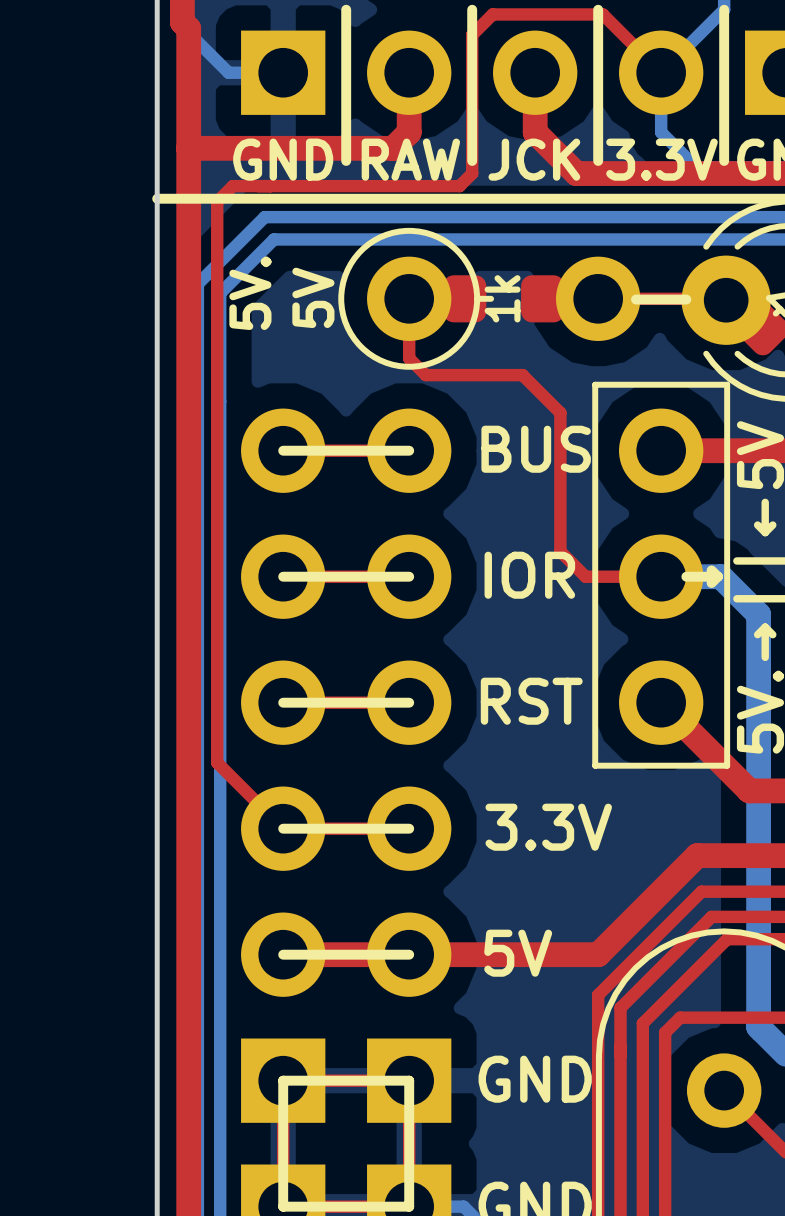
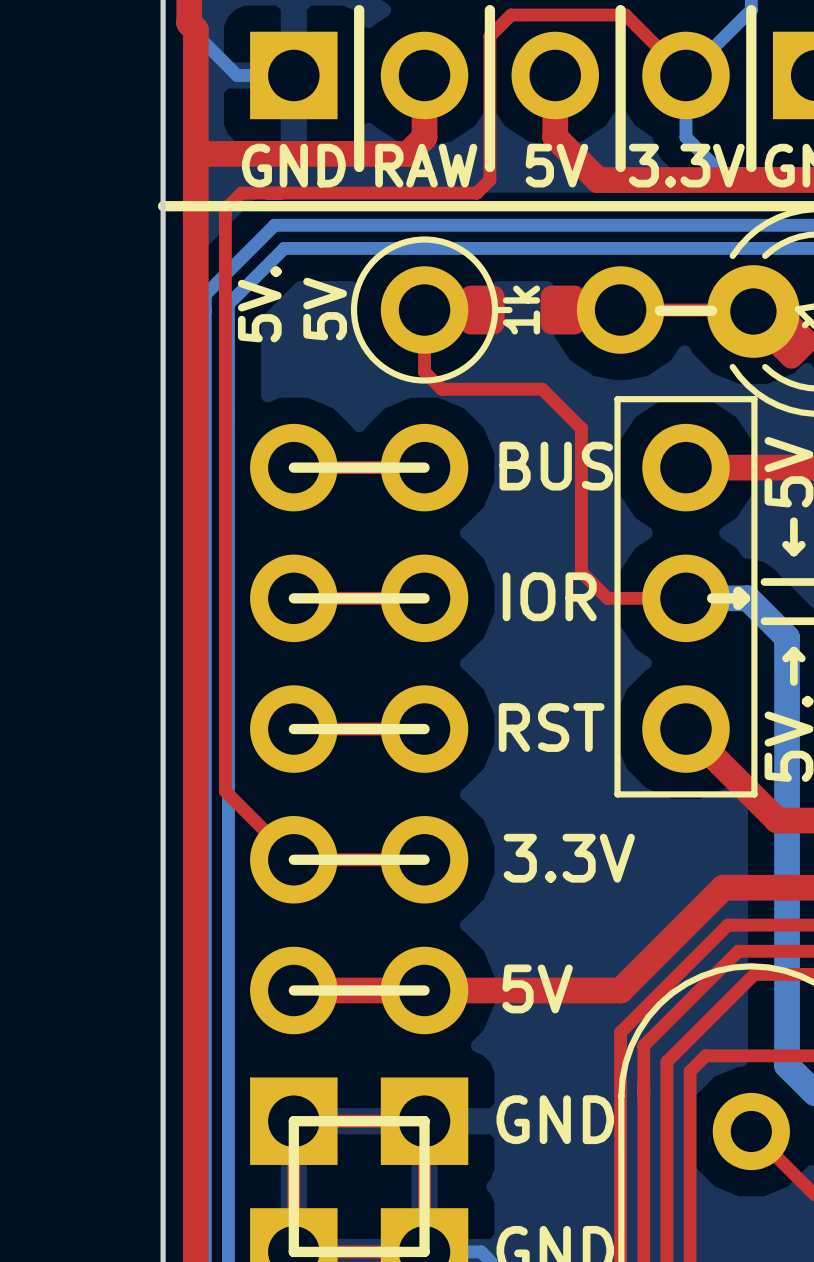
text: JCK (534, 159) -> 5V (556, 165)

